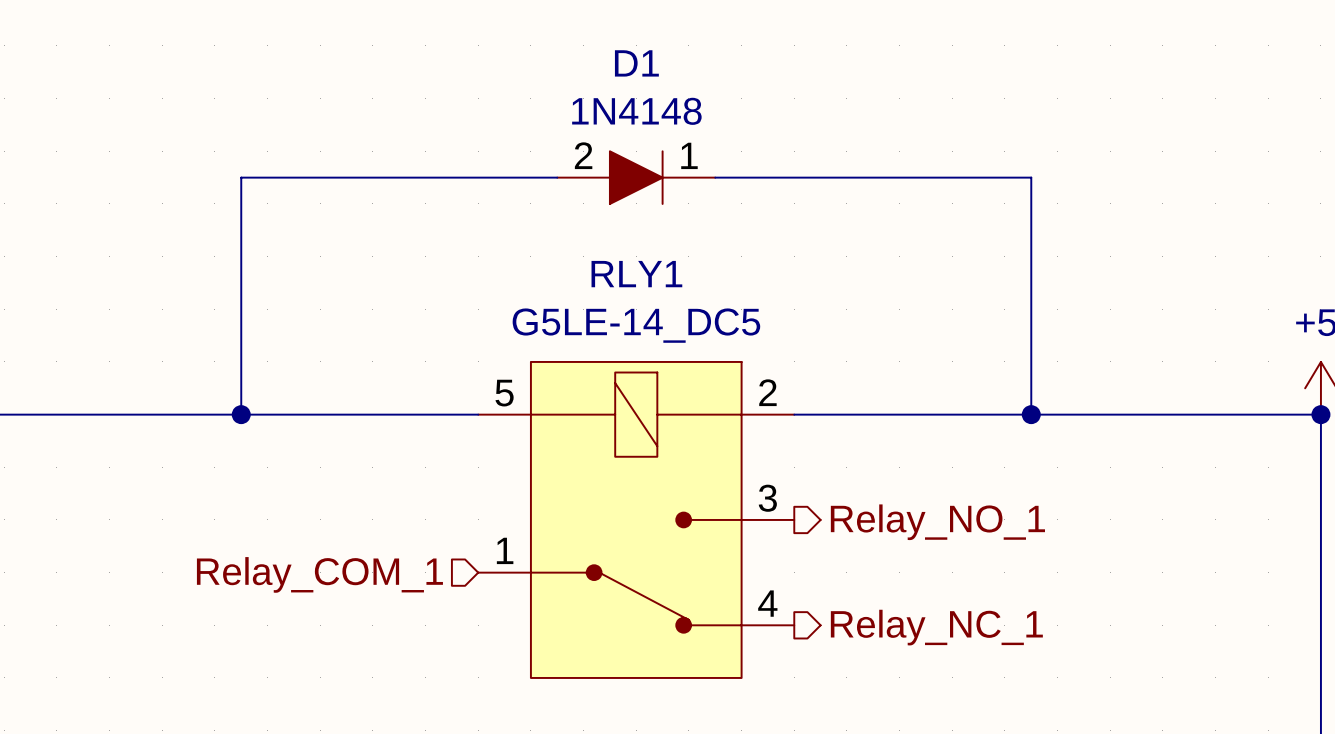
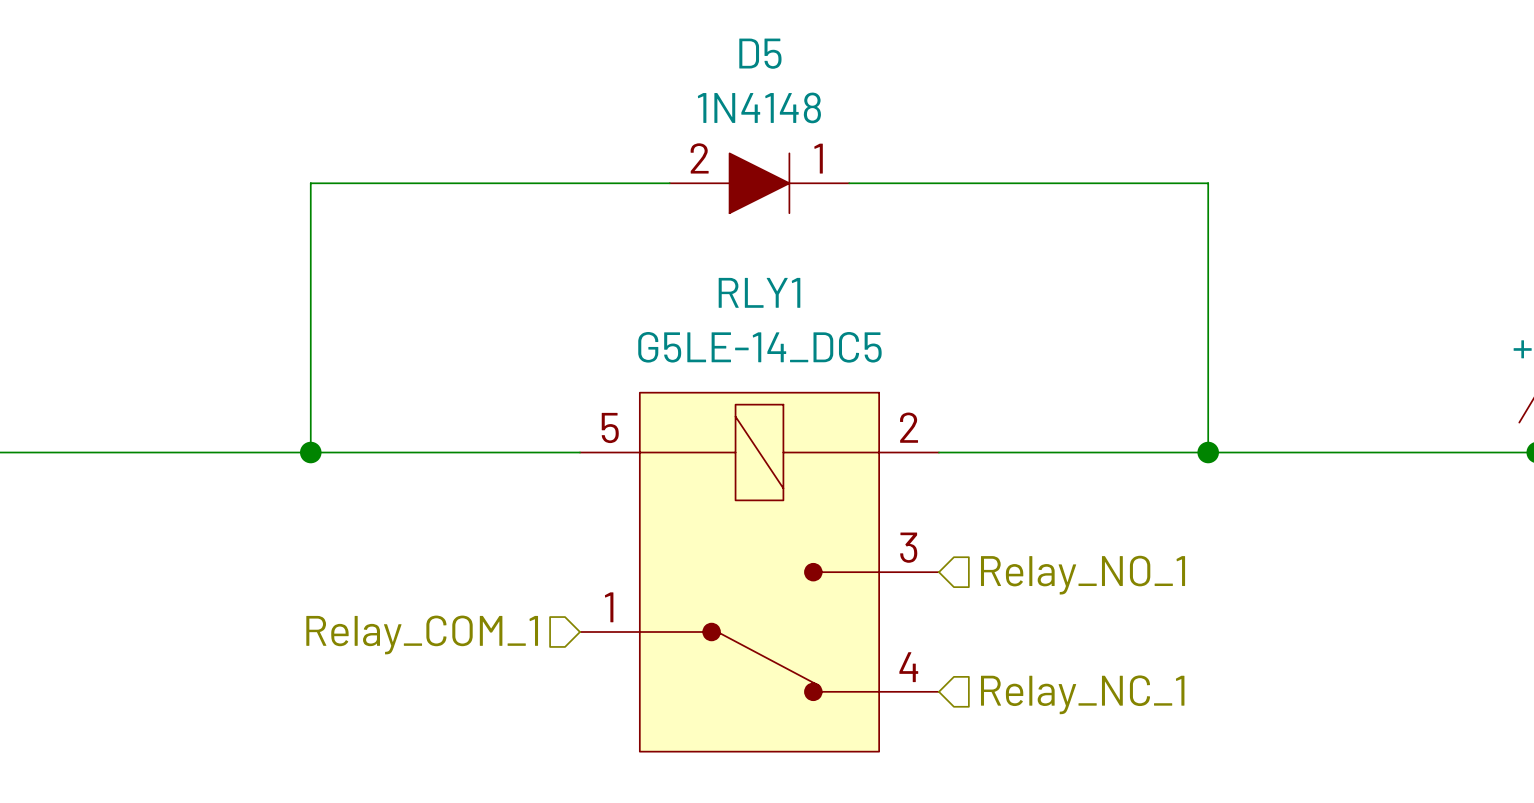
D1 name: D1 (636, 63) -> D5 (760, 53)
hierarchical label shape: output (937, 522) -> input (1083, 575)
hierarchical label shape: output (936, 627) -> input (1082, 694)

